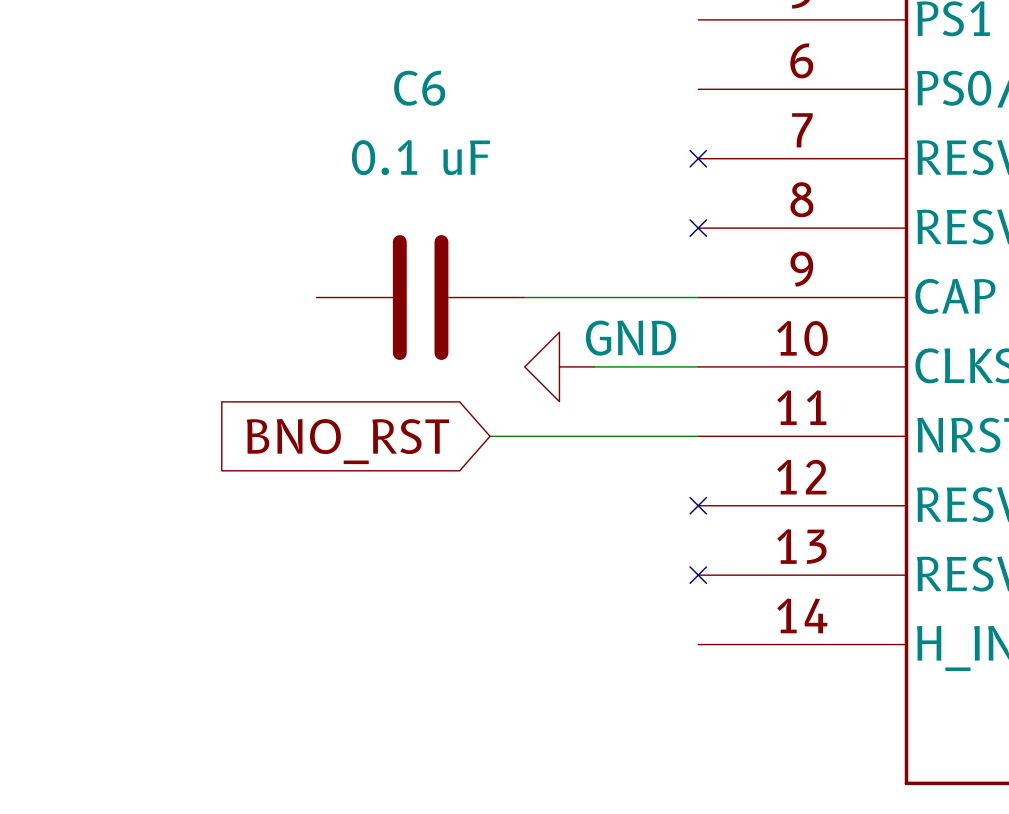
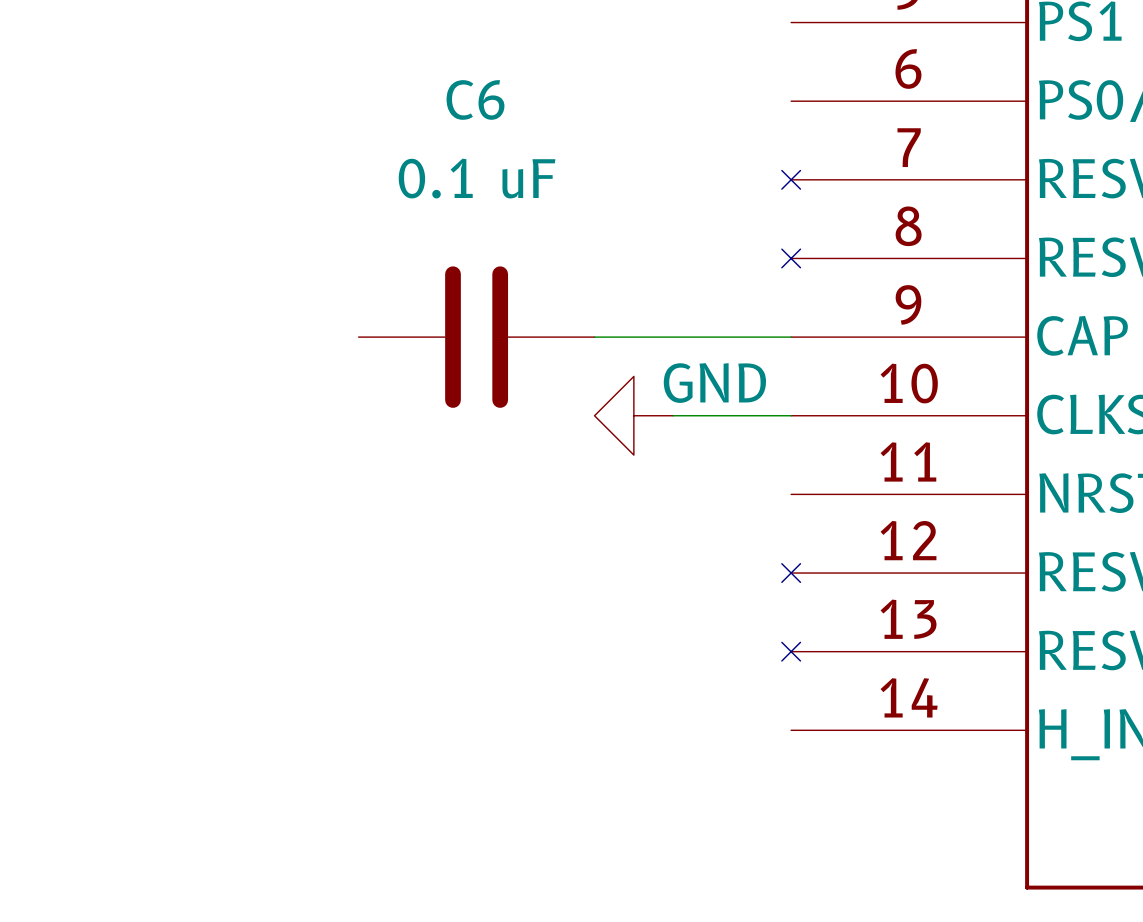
wire: (490, 436) (698, 436) -> none
global label: BNO_RST (347, 441) -> none

